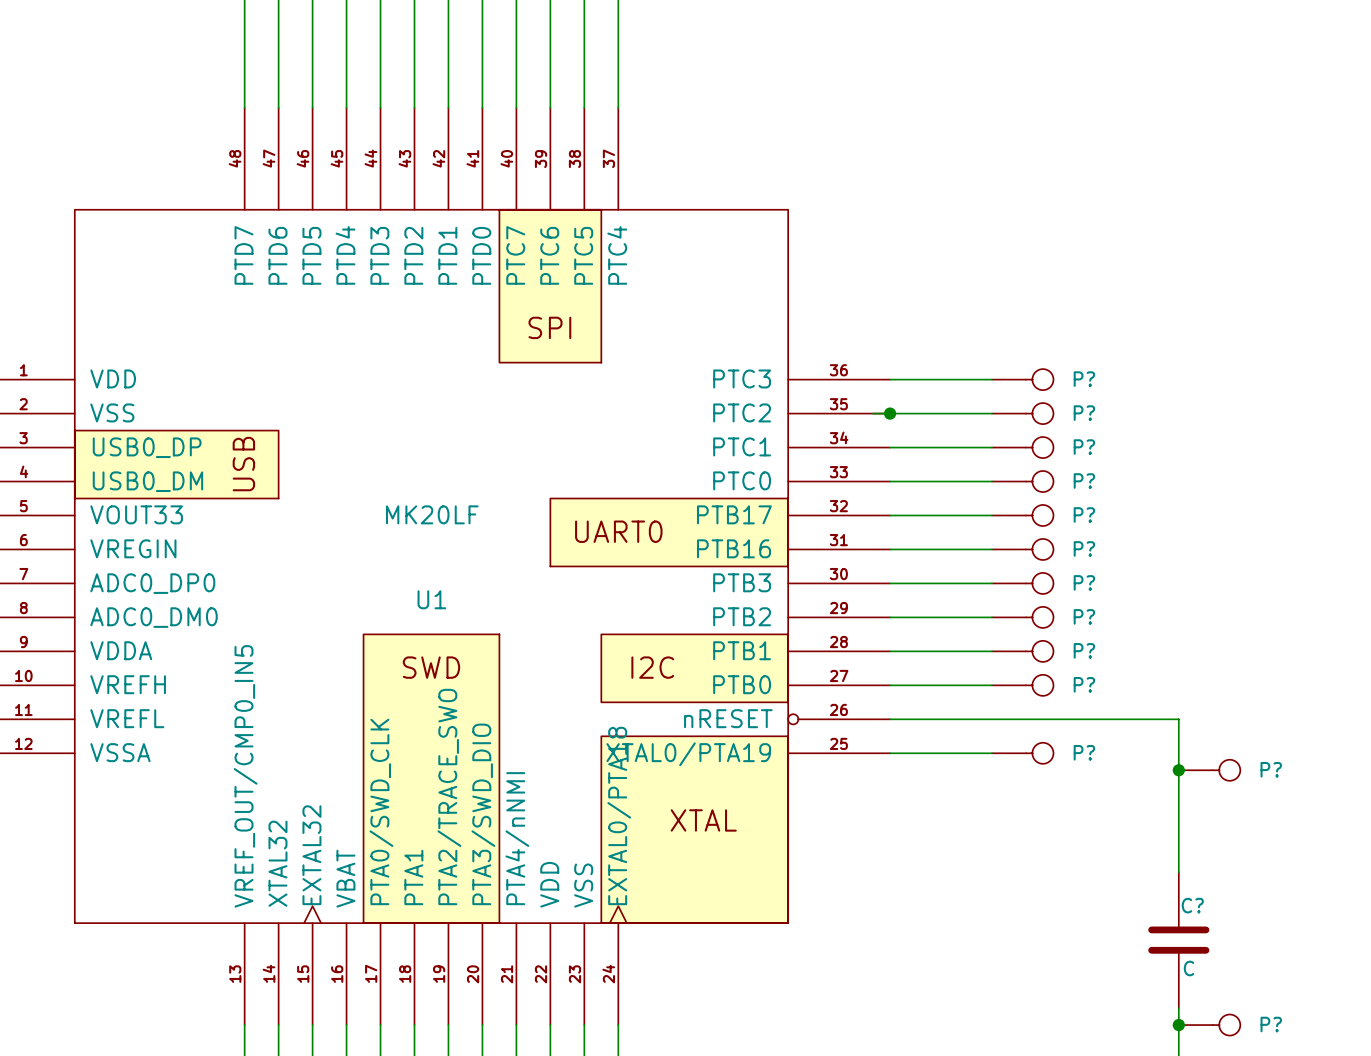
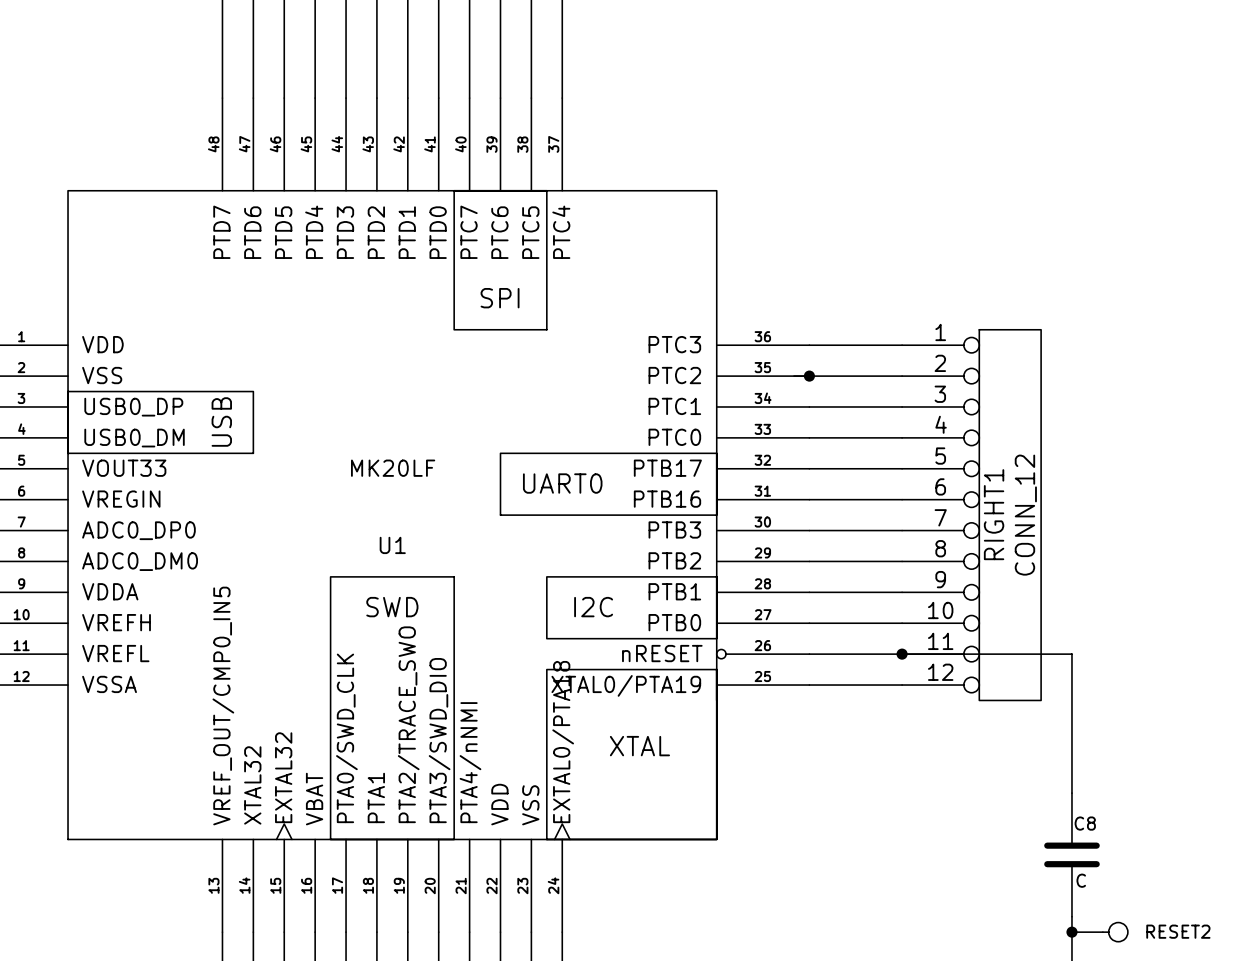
P?: (1022, 379) -> none
P?: (1022, 413) -> none
P?: (1022, 447) -> none
P?: (1022, 481) -> none
P?: (1022, 515) -> none
P?: (1022, 549) -> none
RIGHT1: none -> CONN_12 (971, 515)
P?: (1022, 583) -> none
P?: (1022, 617) -> none
P?: (1022, 651) -> none
P?: (1022, 685) -> none
junction: none -> (902, 654)
P?: (1022, 753) -> none
junction: (1178, 770) -> none
P?: (1209, 770) -> none
C? name: C? (1192, 905) -> C8 (1085, 823)
P? name: P? (1271, 1024) -> RESET2 (1178, 931)

